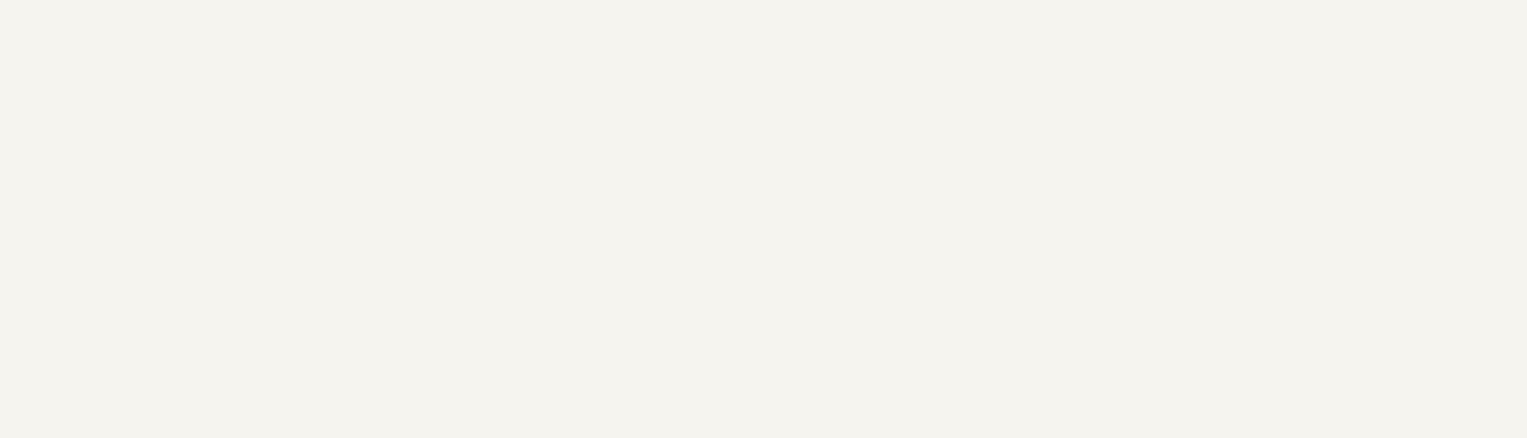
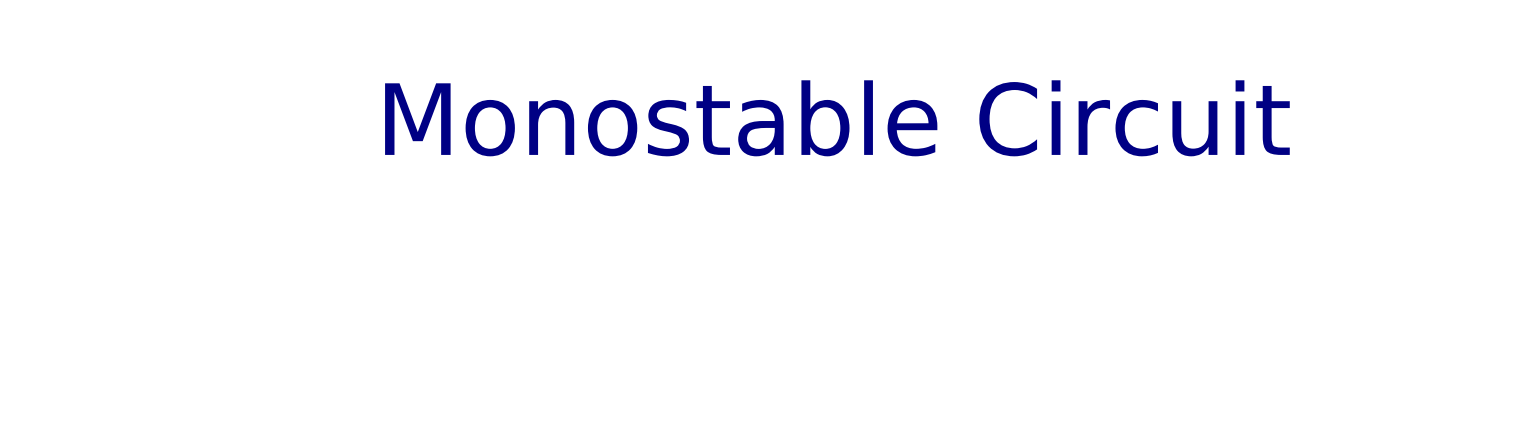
text: none -> Monostable Circuit (837, 118)

